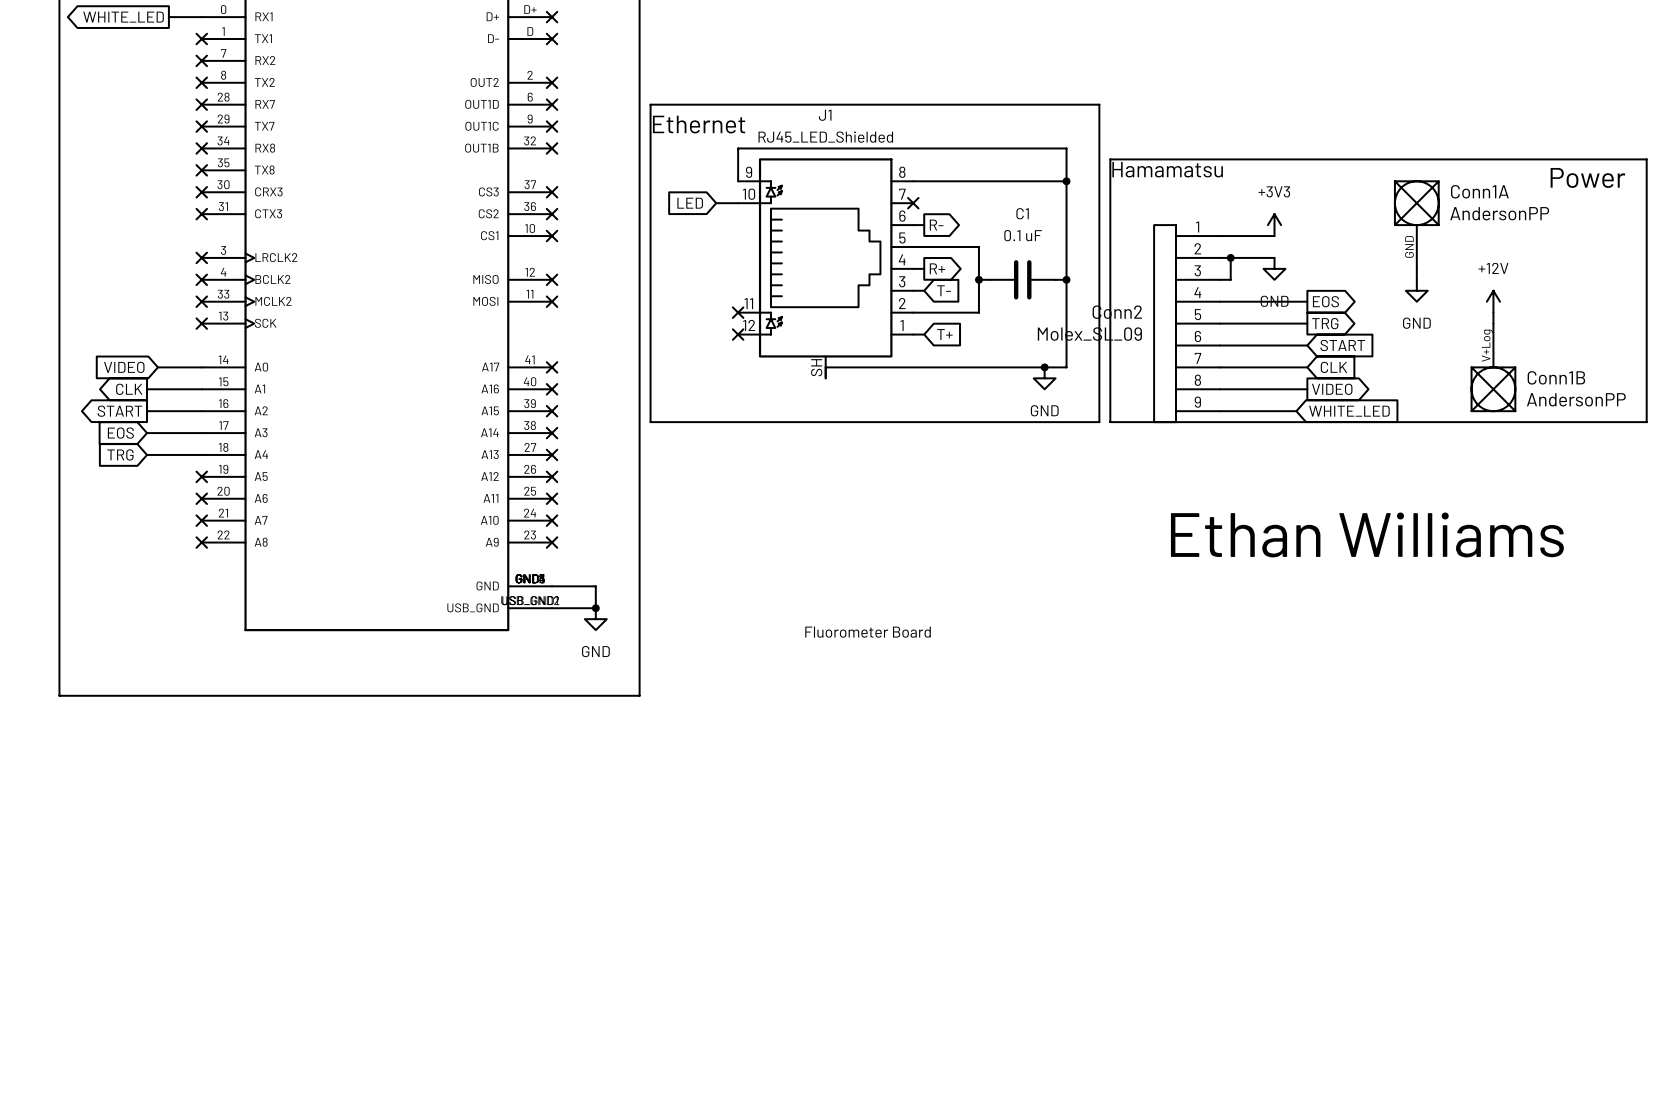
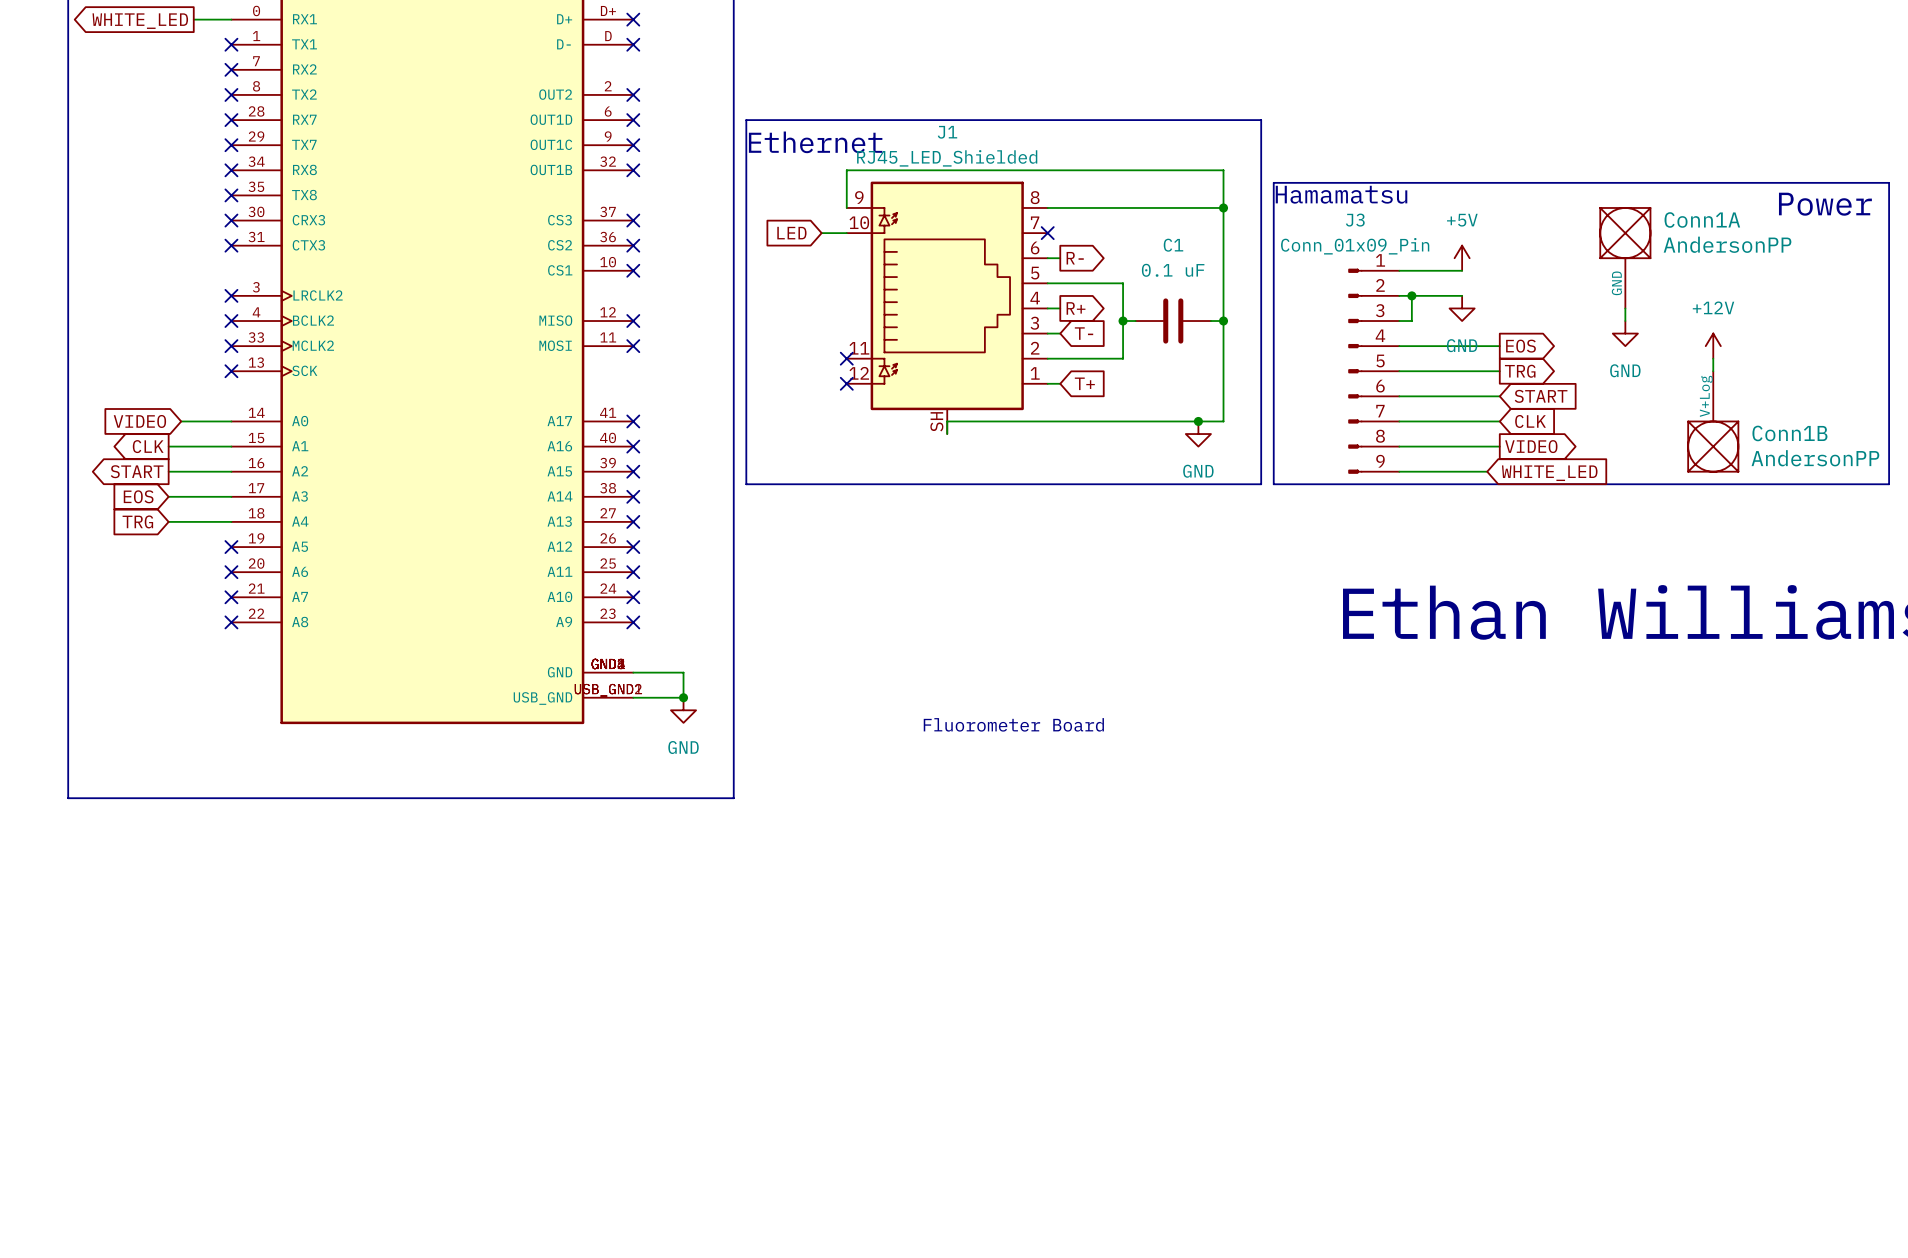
power symbol: +3V3 (1274, 225) -> +5V (1462, 258)
Conn2: Molex_SL_09 (1186, 323) -> none
J3: none -> Conn_01x09_Pin (1373, 371)

